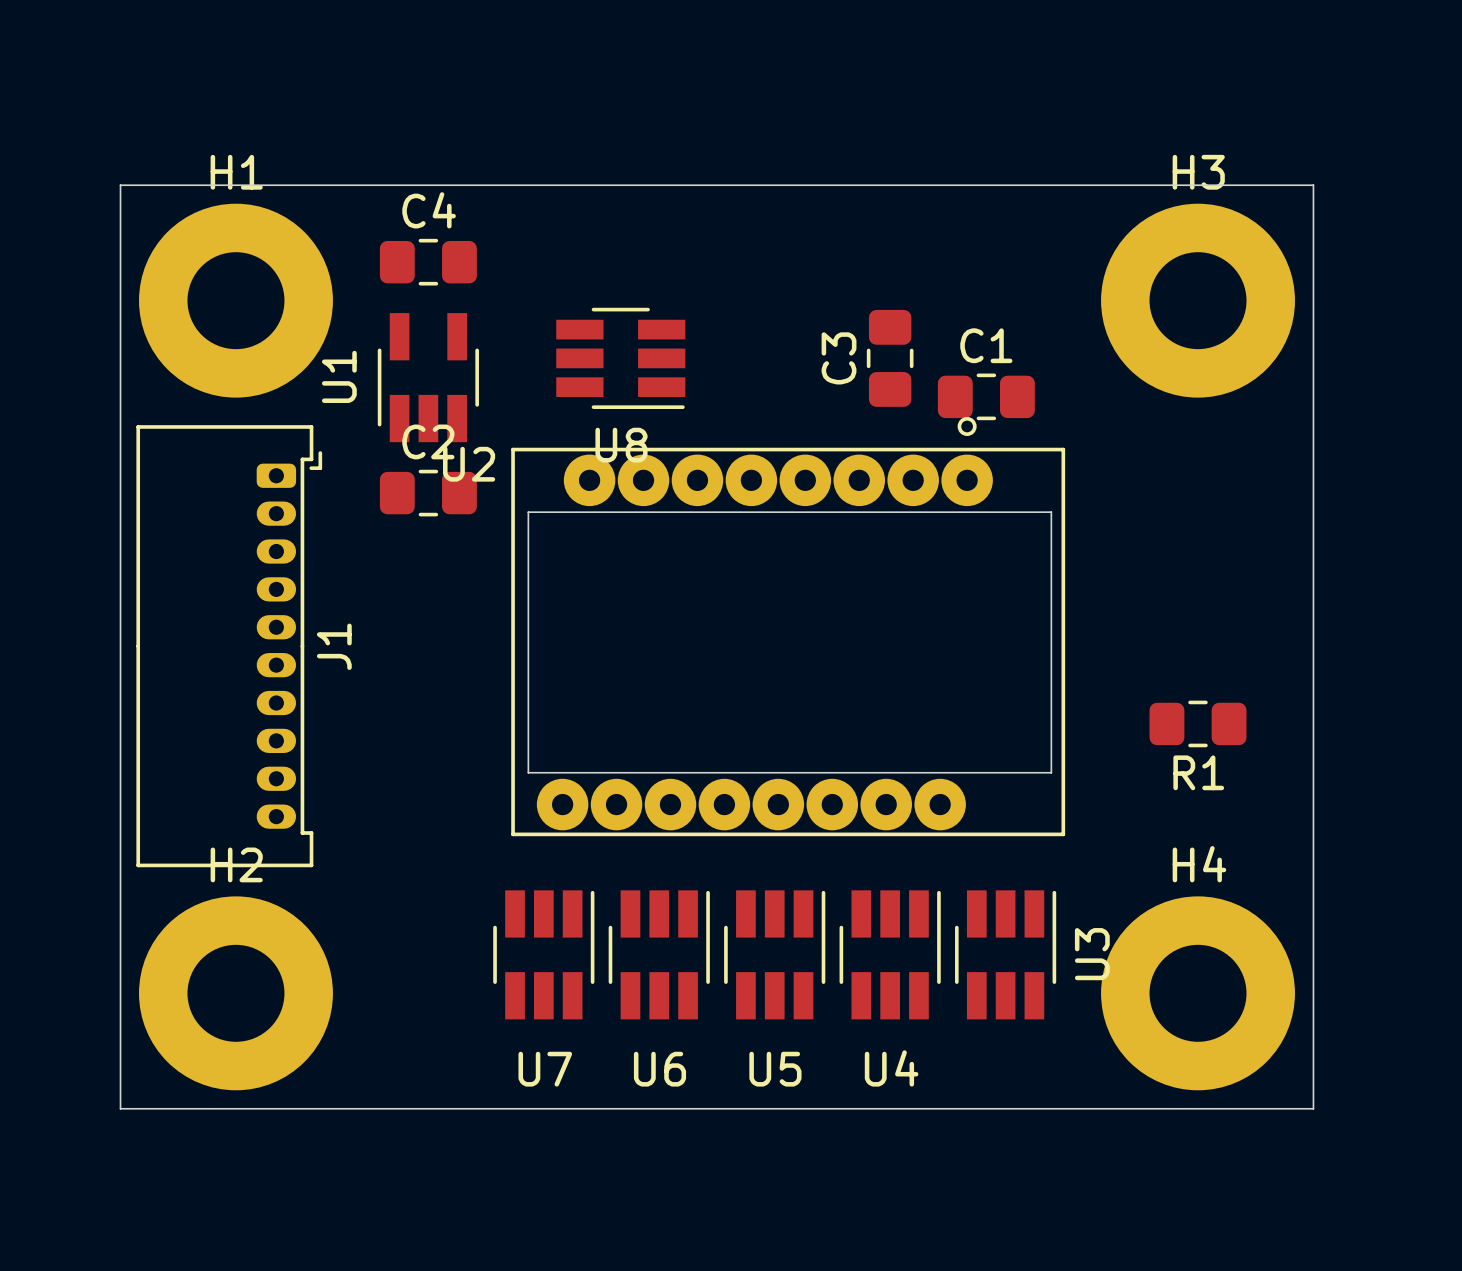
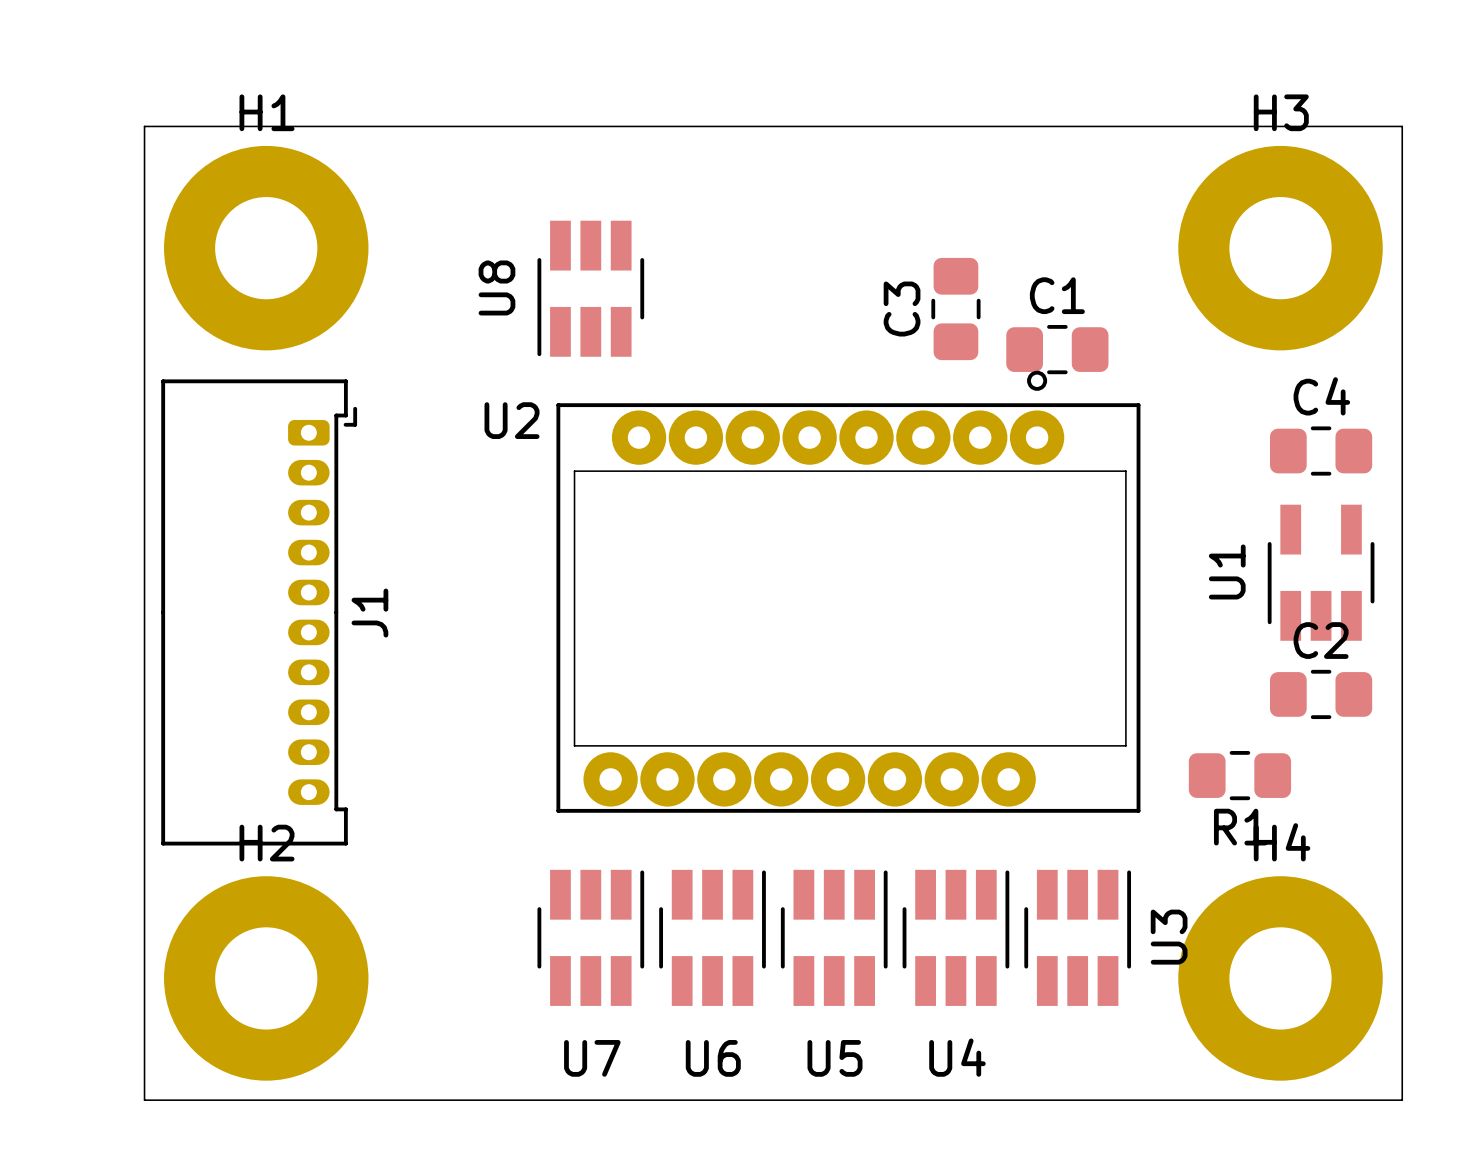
C4 position: (428, 262) -> (1321, 451)
U8 rotation: 0° (620, 358) -> 90° clockwise (590, 288)
U8 position: (620, 358) -> (590, 288)
U1 position: (428, 377) -> (1321, 572)
C2 position: (428, 493) -> (1321, 694)
R1 position: (1198, 723) -> (1239, 775)

